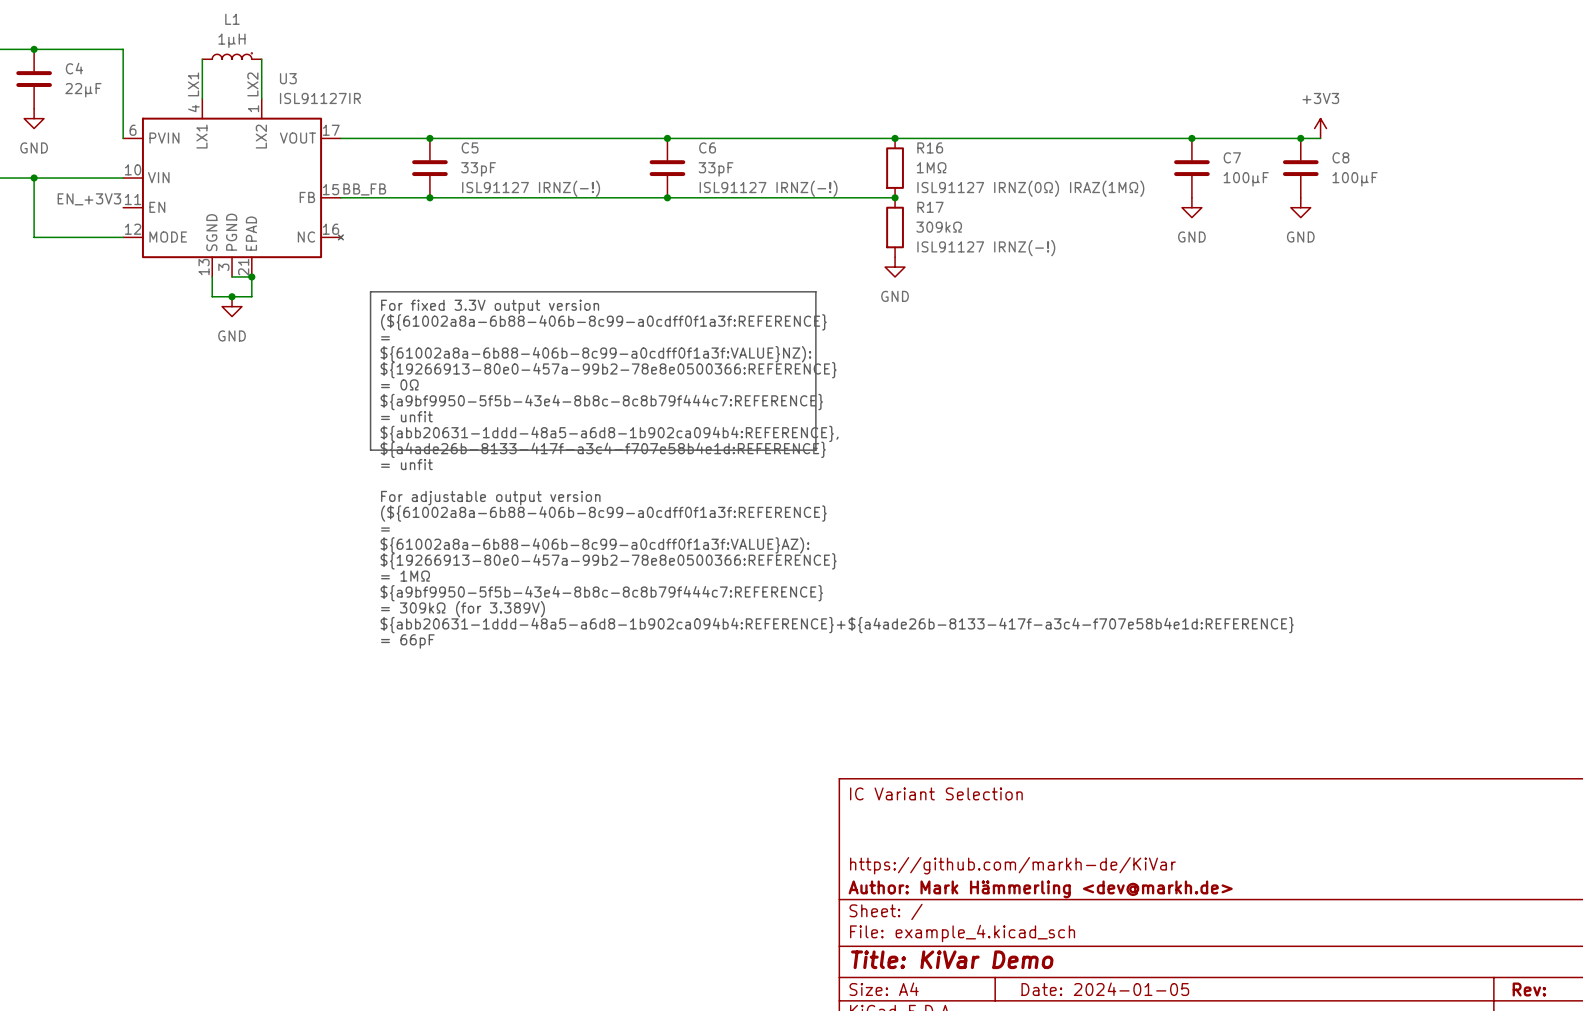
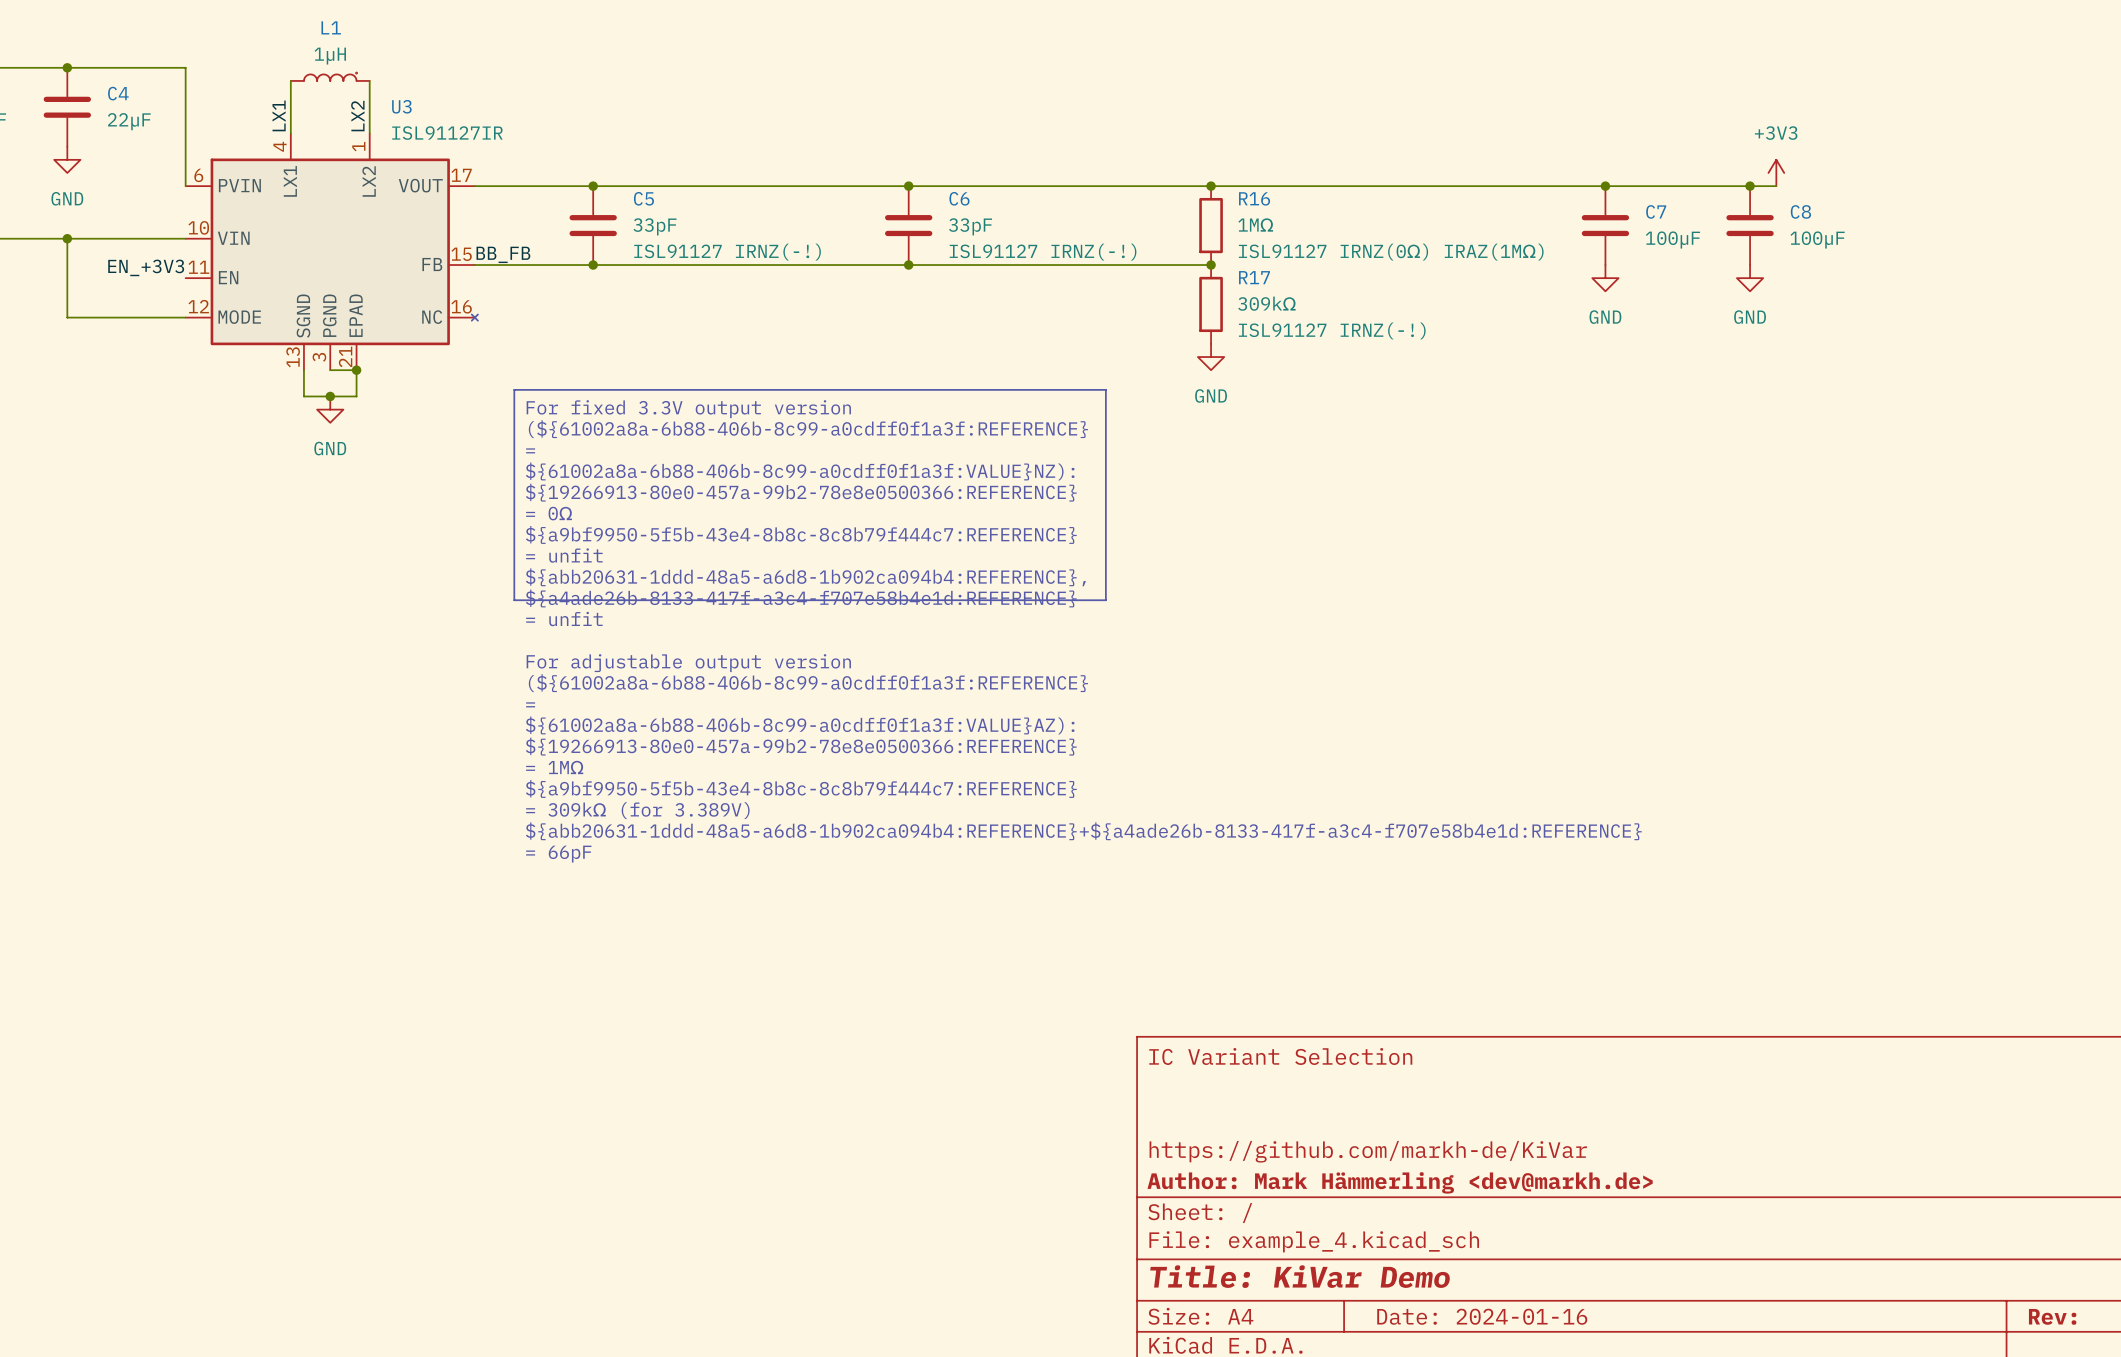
title block: Date: 2024-01-05 (1105, 989) -> Date: 2024-01-16 (1482, 1316)

